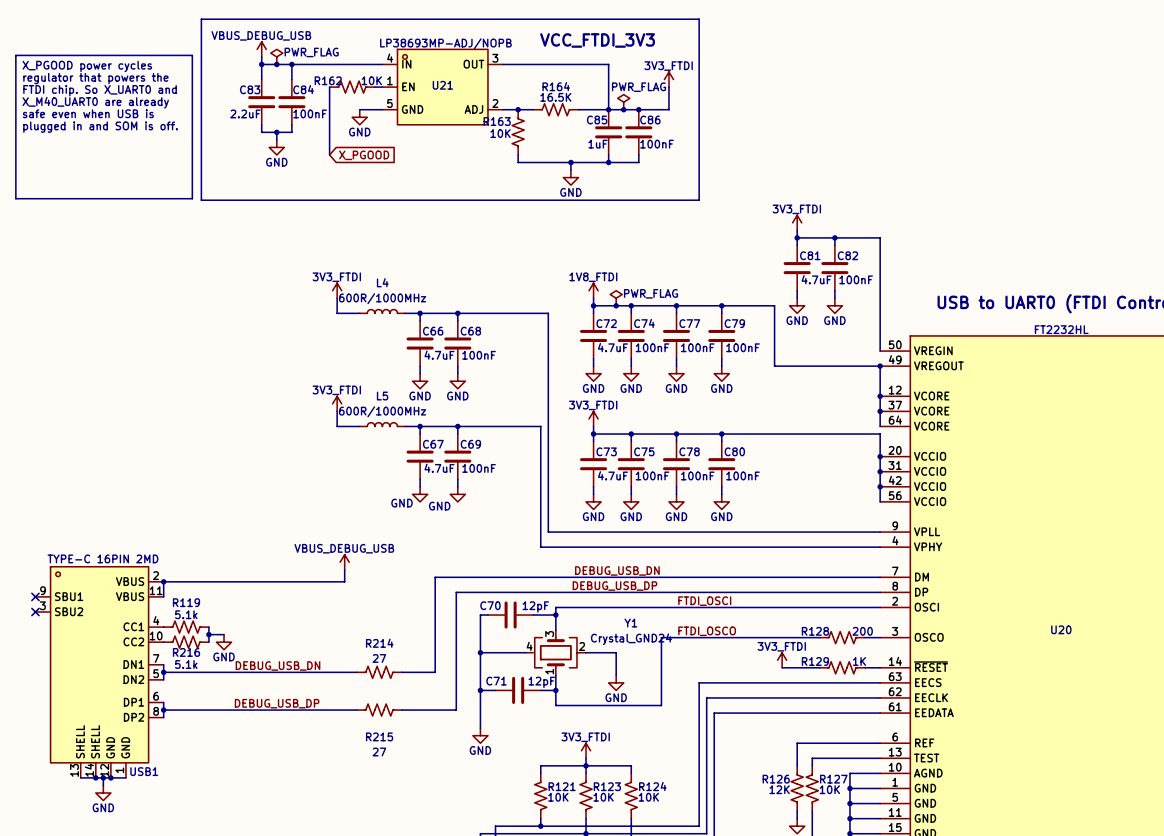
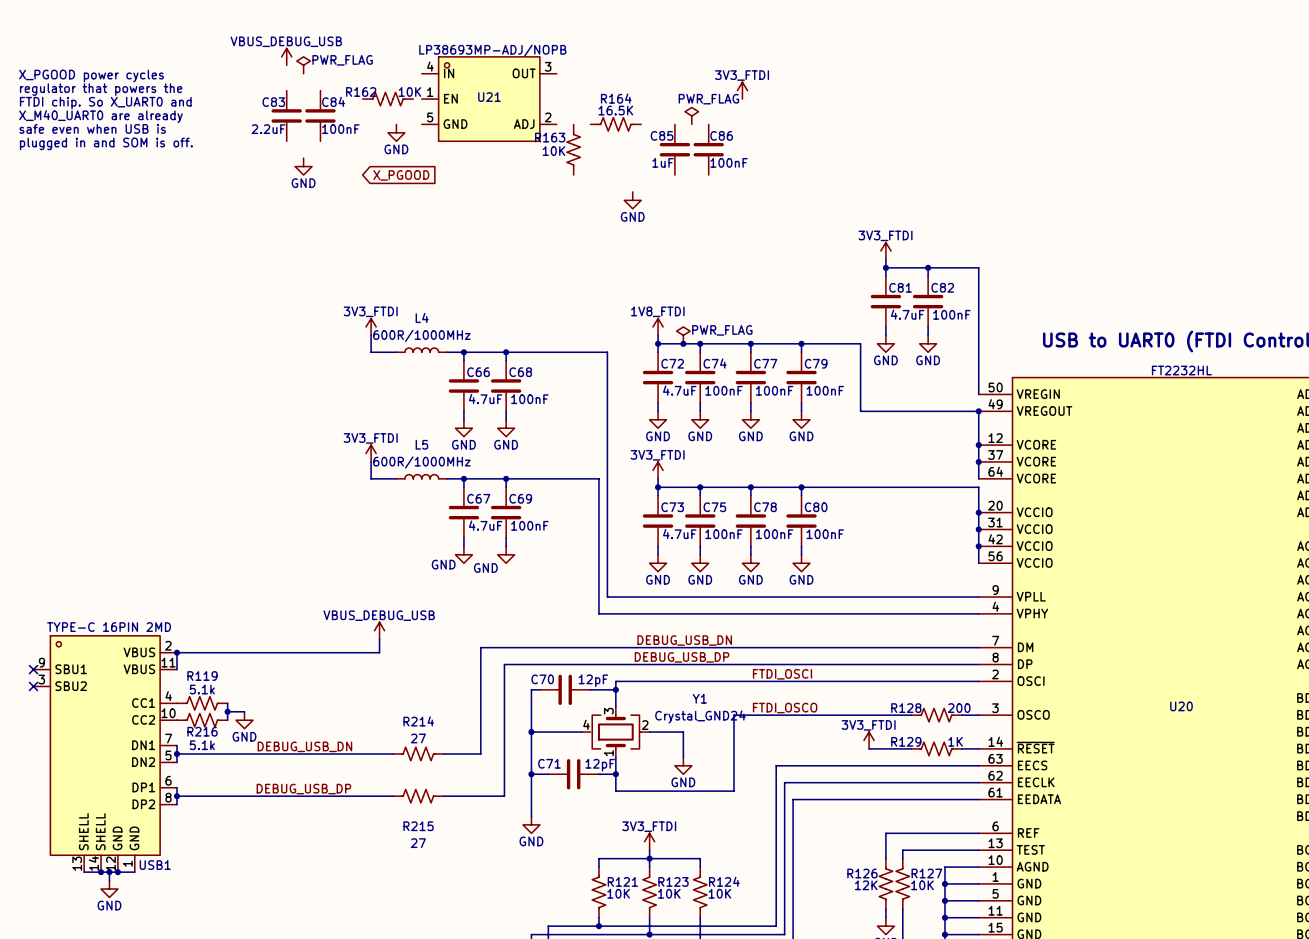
line: (201, 19) (699, 19) (699, 200) (201, 200) (201, 19) -> none
text: VCC_FTDI_3V3 (597, 40) -> none
line: (15, 55) (192, 55) (192, 198) (15, 198) (15, 55) -> none
wire: (261, 56) (261, 79) -> none
wire: (261, 64) (382, 64) -> none
junction: (261, 64) -> none
junction: (276, 64) -> none
wire: (291, 64) (291, 79) -> none
junction: (291, 64) -> none
wire: (503, 64) (608, 64) (608, 109) -> none
wire: (329, 87) (329, 154) -> none
wire: (374, 87) (382, 87) -> none
wire: (668, 87) (668, 109) (578, 109) -> none
wire: (359, 109) (382, 109) -> none
wire: (503, 109) (533, 109) -> none
junction: (518, 109) -> none
junction: (608, 109) -> none
junction: (623, 109) -> none
junction: (638, 109) -> none
wire: (261, 124) (261, 132) (291, 132) (291, 124) -> none
wire: (276, 132) (276, 139) -> none
junction: (276, 132) -> none
wire: (518, 154) (518, 162) (638, 162) (638, 154) -> none
wire: (608, 154) (608, 162) -> none
wire: (570, 162) (570, 170) -> none
junction: (570, 162) -> none
junction: (608, 162) -> none

